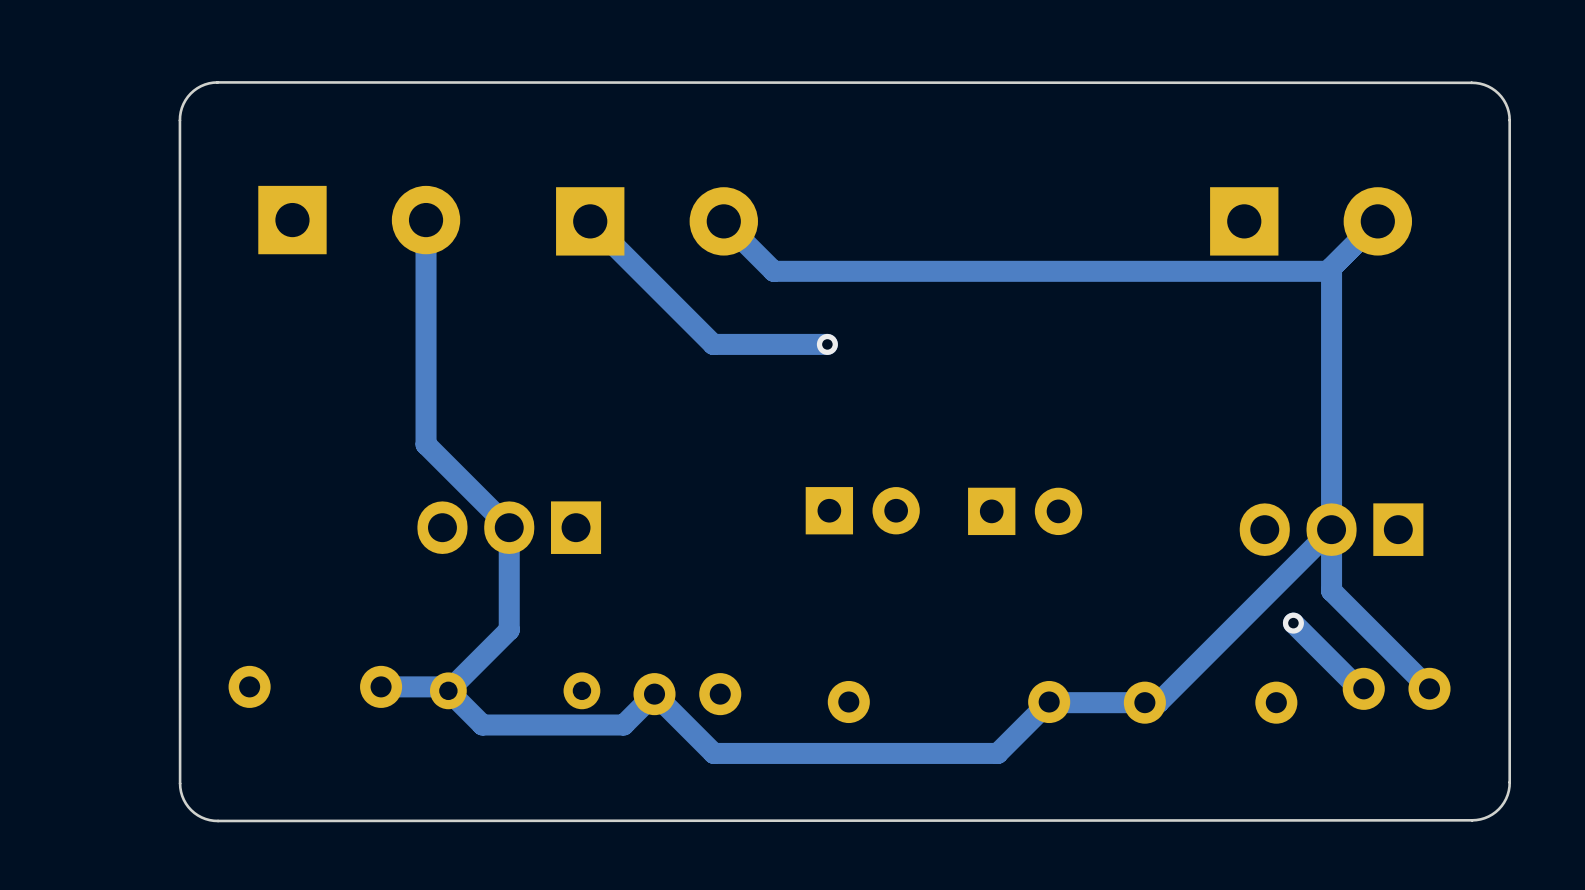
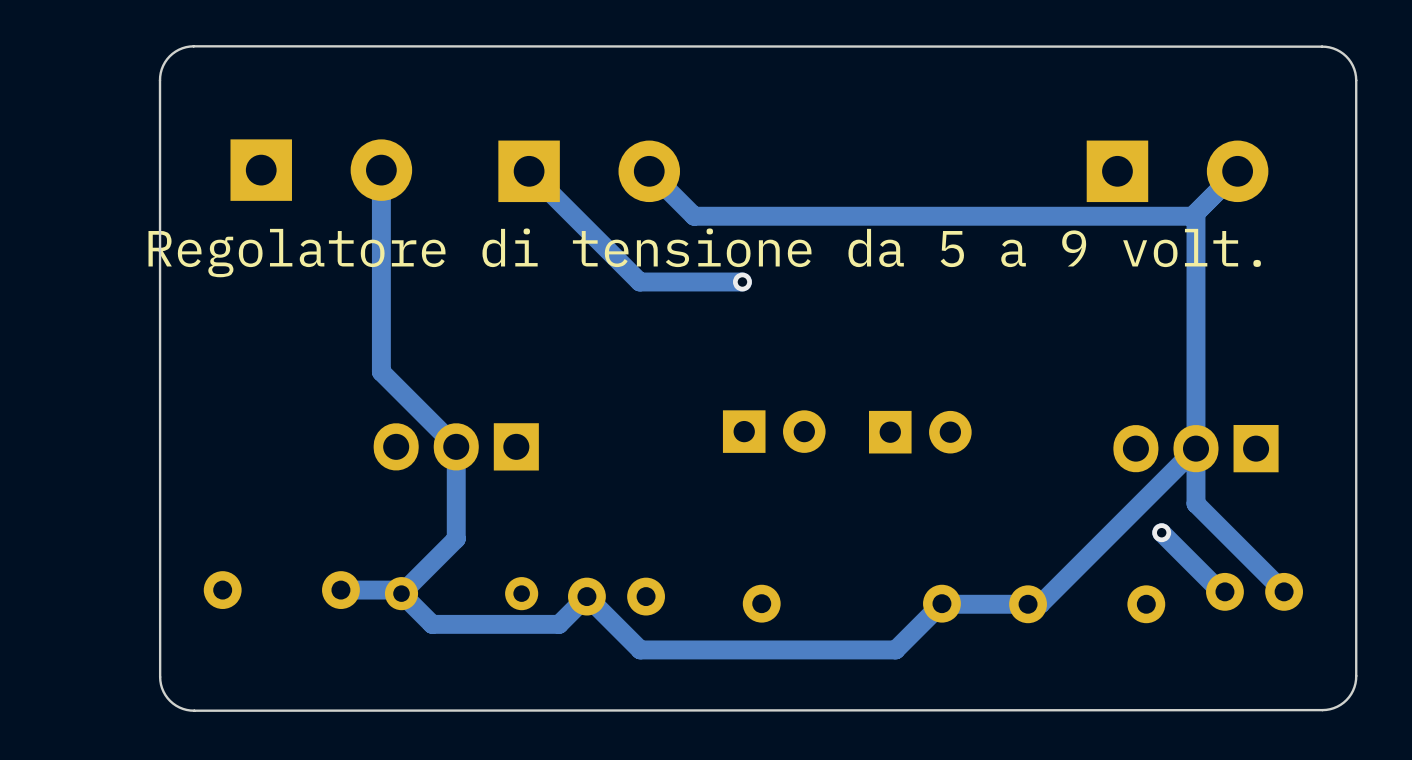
text: none -> Regolatore di tensione da 5 a 9 volt. (704, 252)

